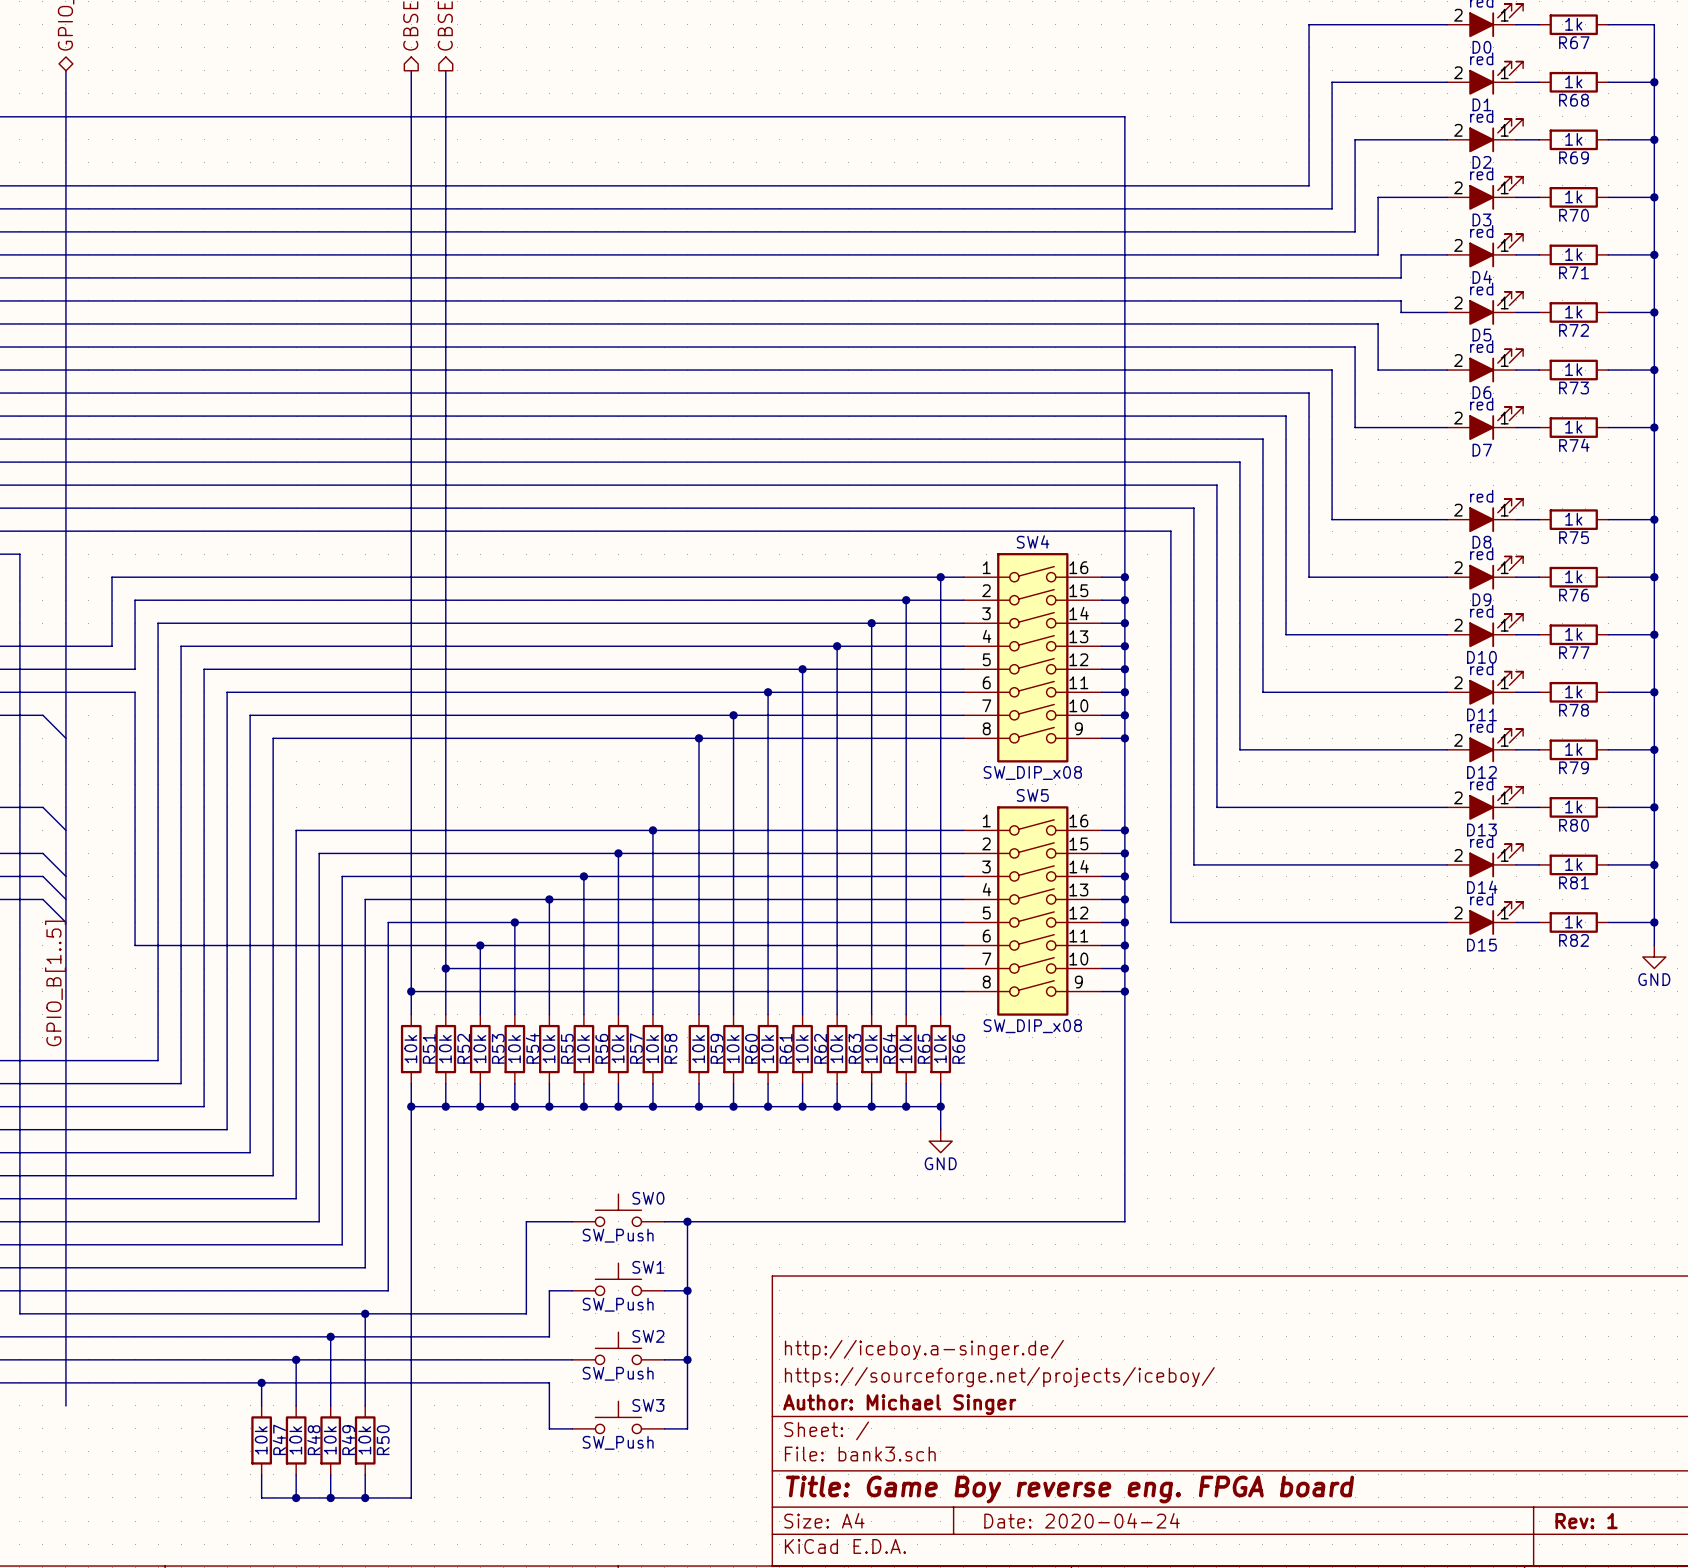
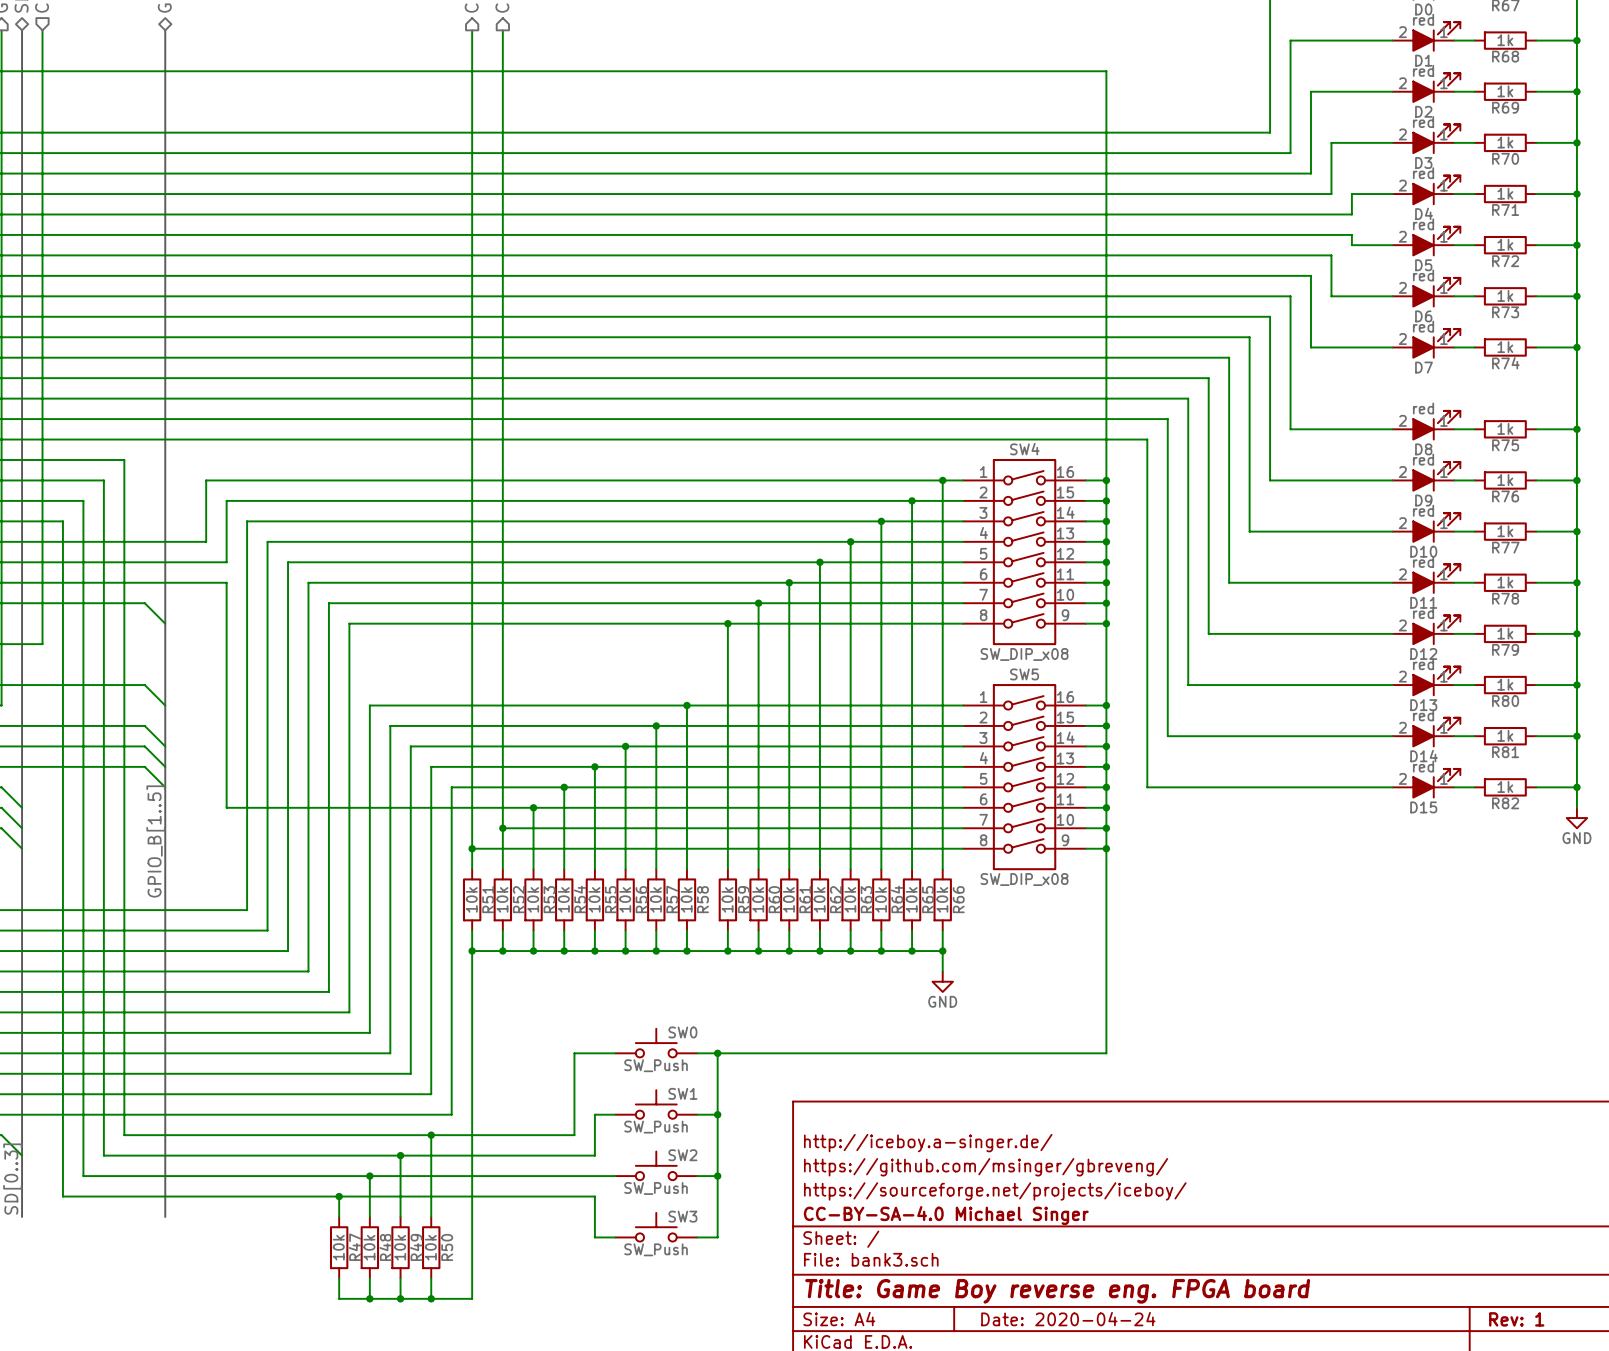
title block: none -> http://iceboy.a-singer.de/ (928, 1143)
title block: http://iceboy.a-singer.de/ (924, 1349) -> https://github.com/msinger/gbreveng/ (986, 1167)
title block: Author: Michael Singer (899, 1404) -> CC-BY-SA-4.0 Michael Singer (946, 1215)

